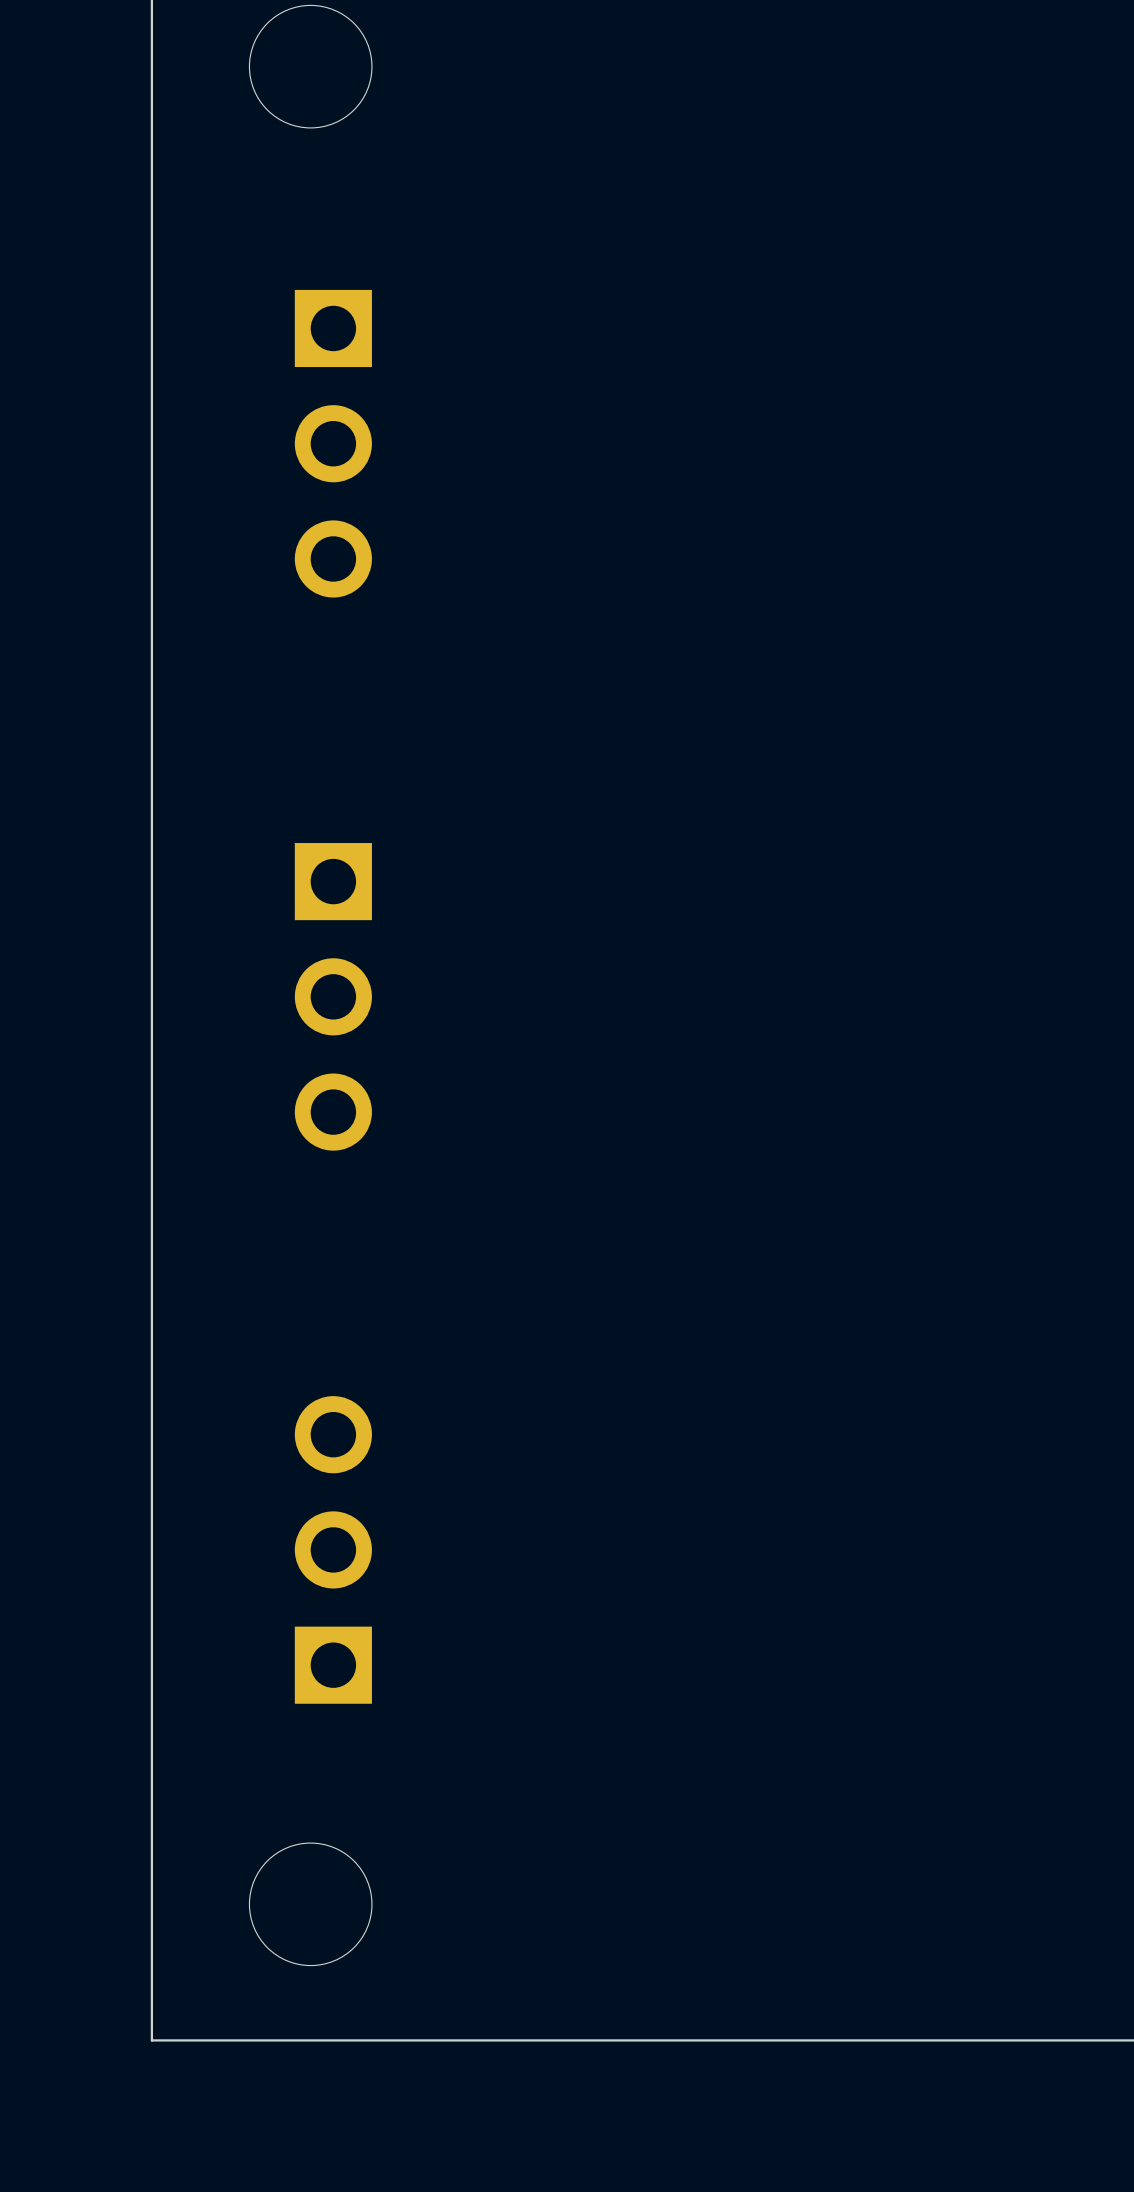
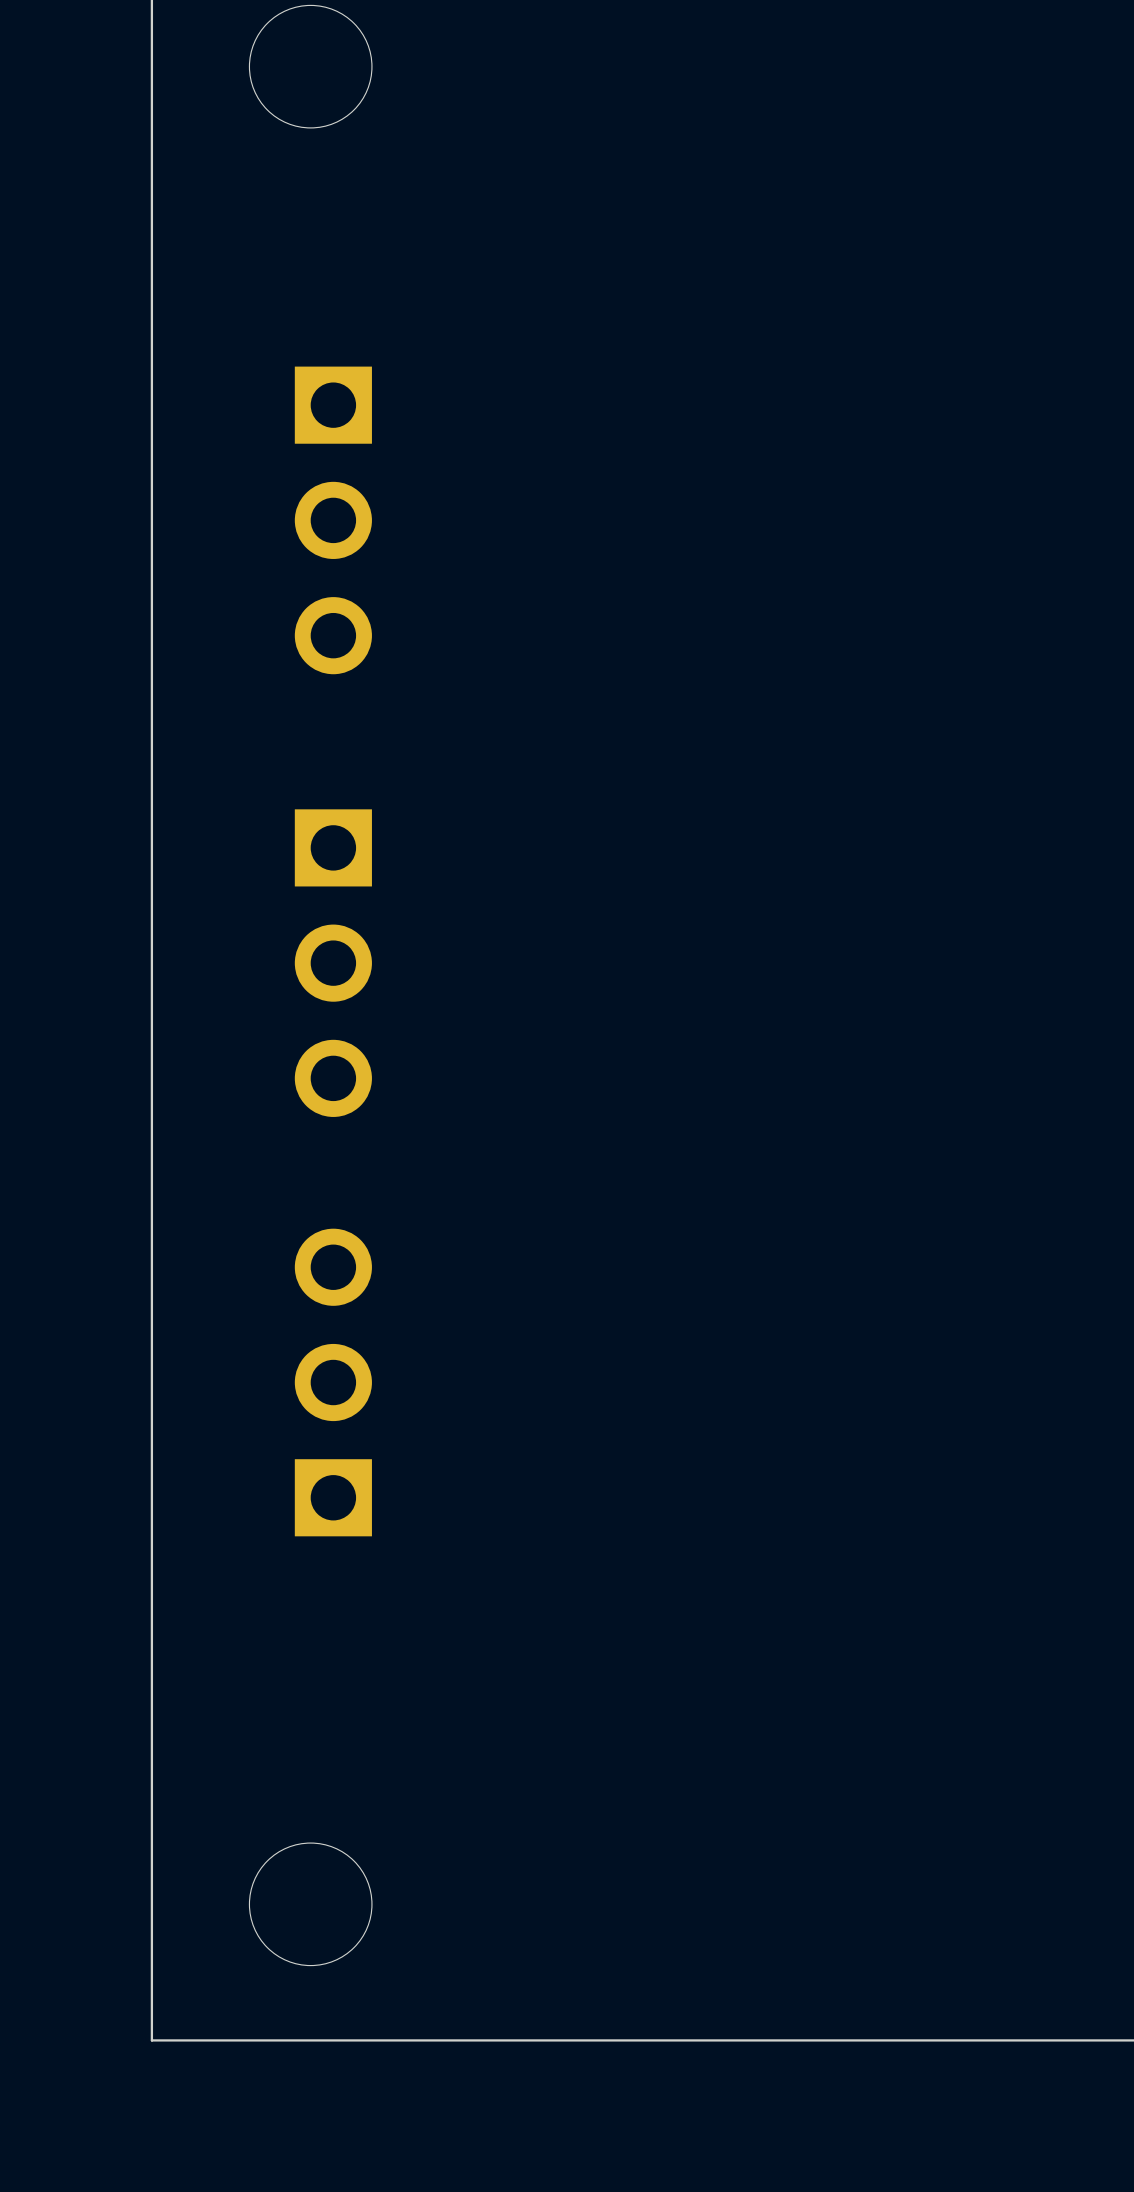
part position: (333, 443) -> (333, 520)
part position: (333, 996) -> (333, 963)
part position: (333, 1549) -> (333, 1382)

